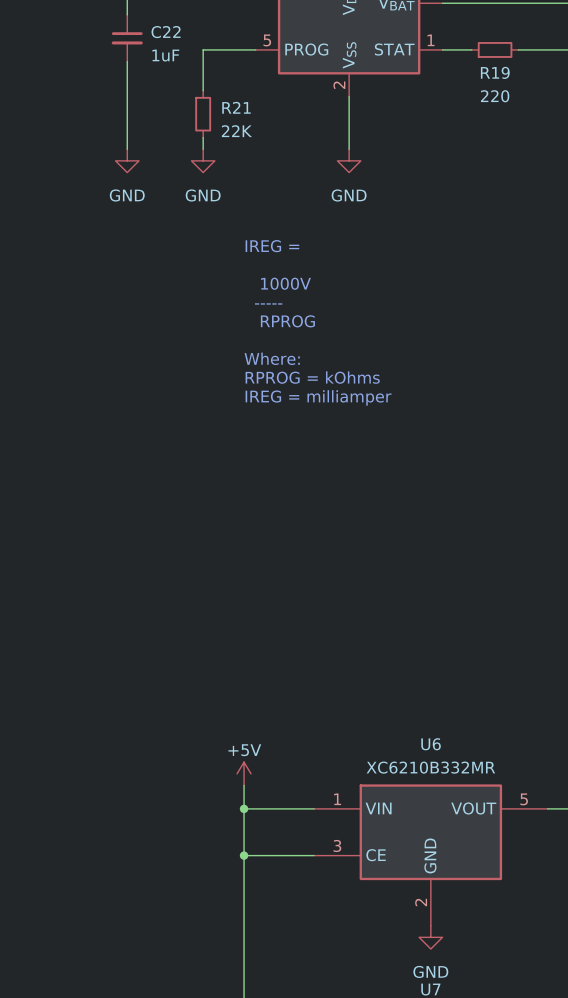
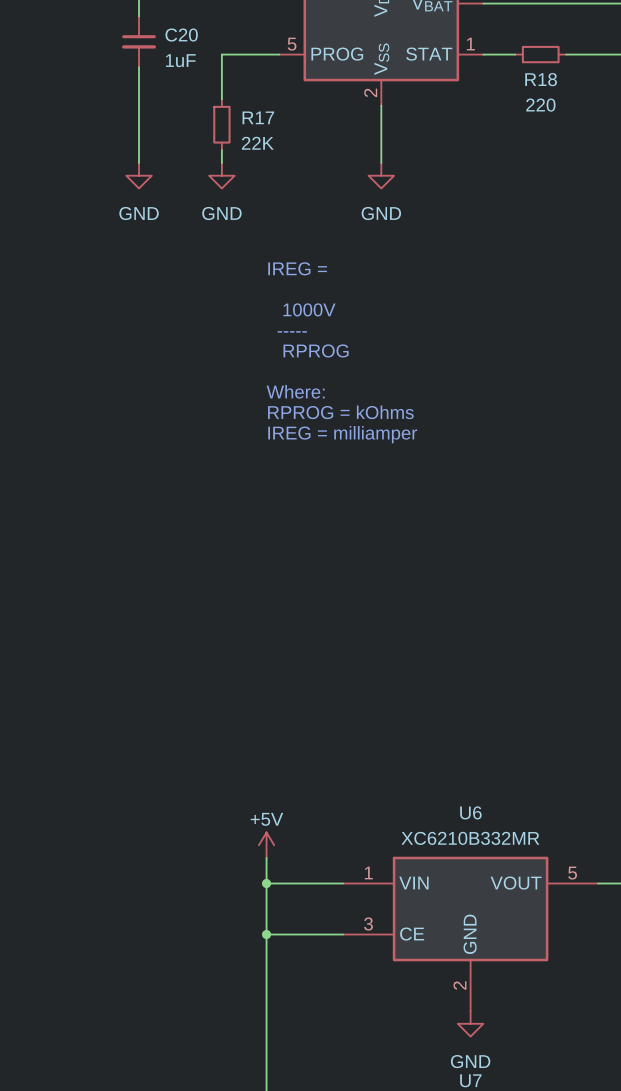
C22 name: C22 (166, 32) -> C20 (181, 35)
R19 name: R19 (495, 72) -> R18 (541, 79)
R21 name: R21 (236, 107) -> R17 (258, 117)

